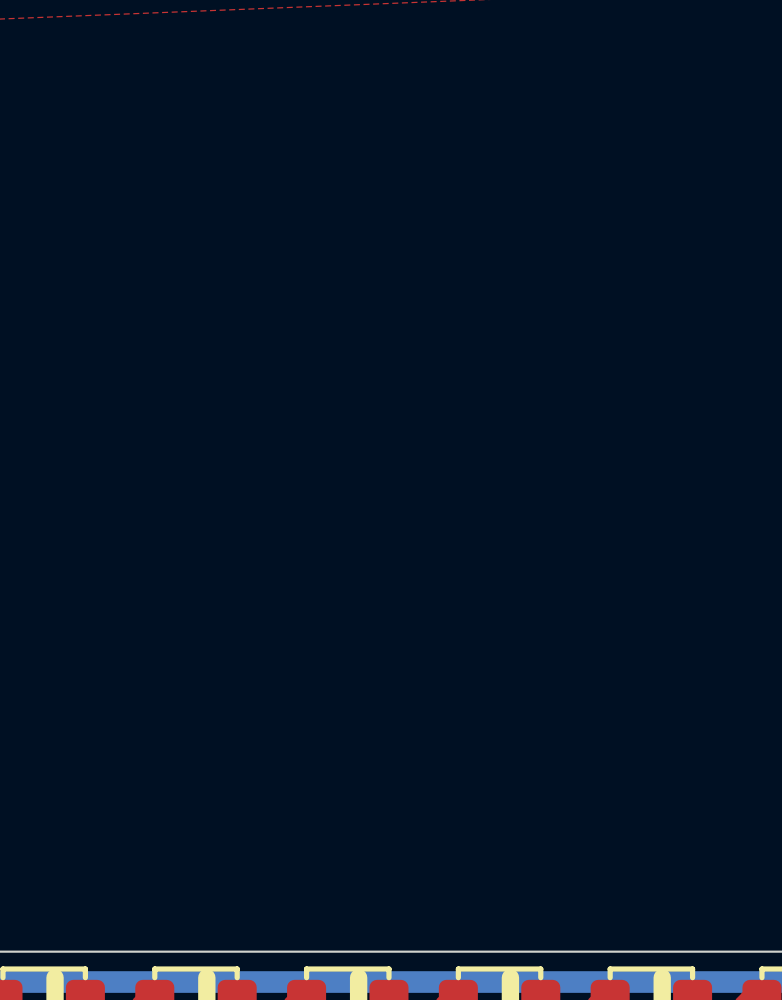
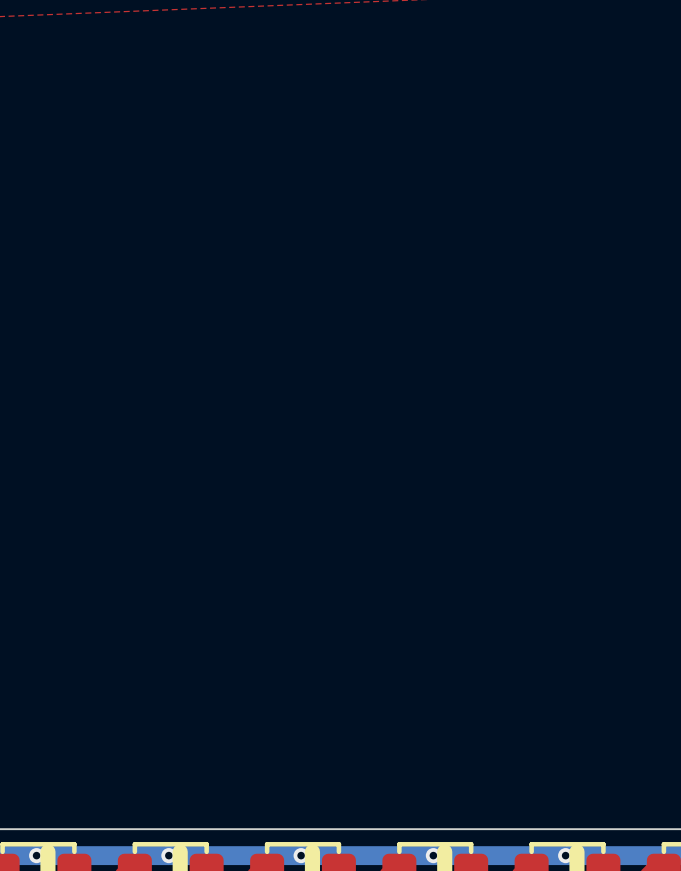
via: none -> (36, 855)
via: none -> (168, 855)
via: none -> (301, 855)
via: none -> (433, 855)
via: none -> (565, 855)

